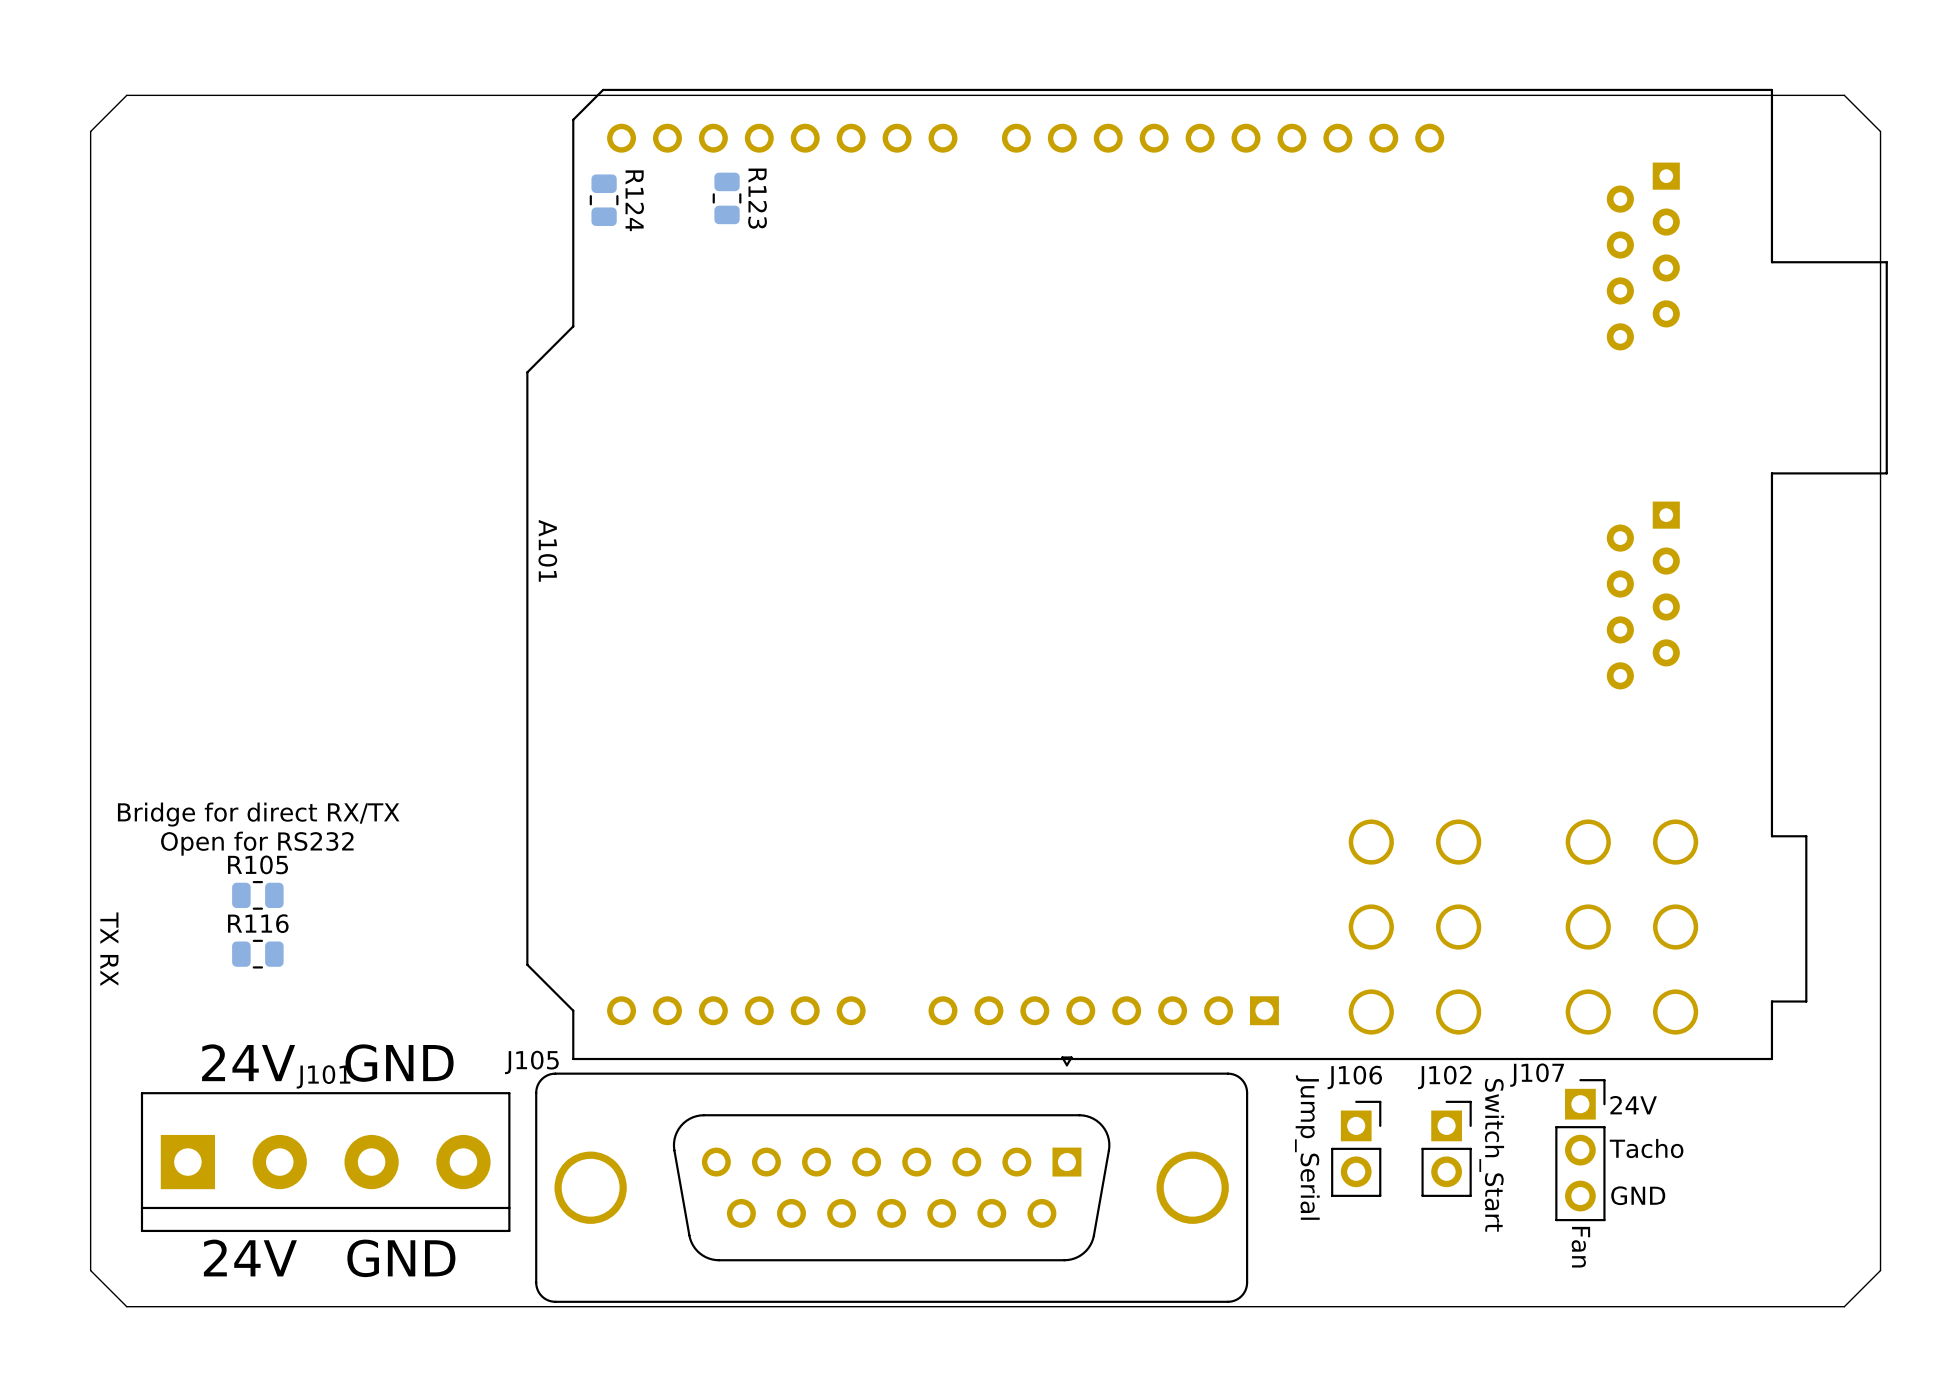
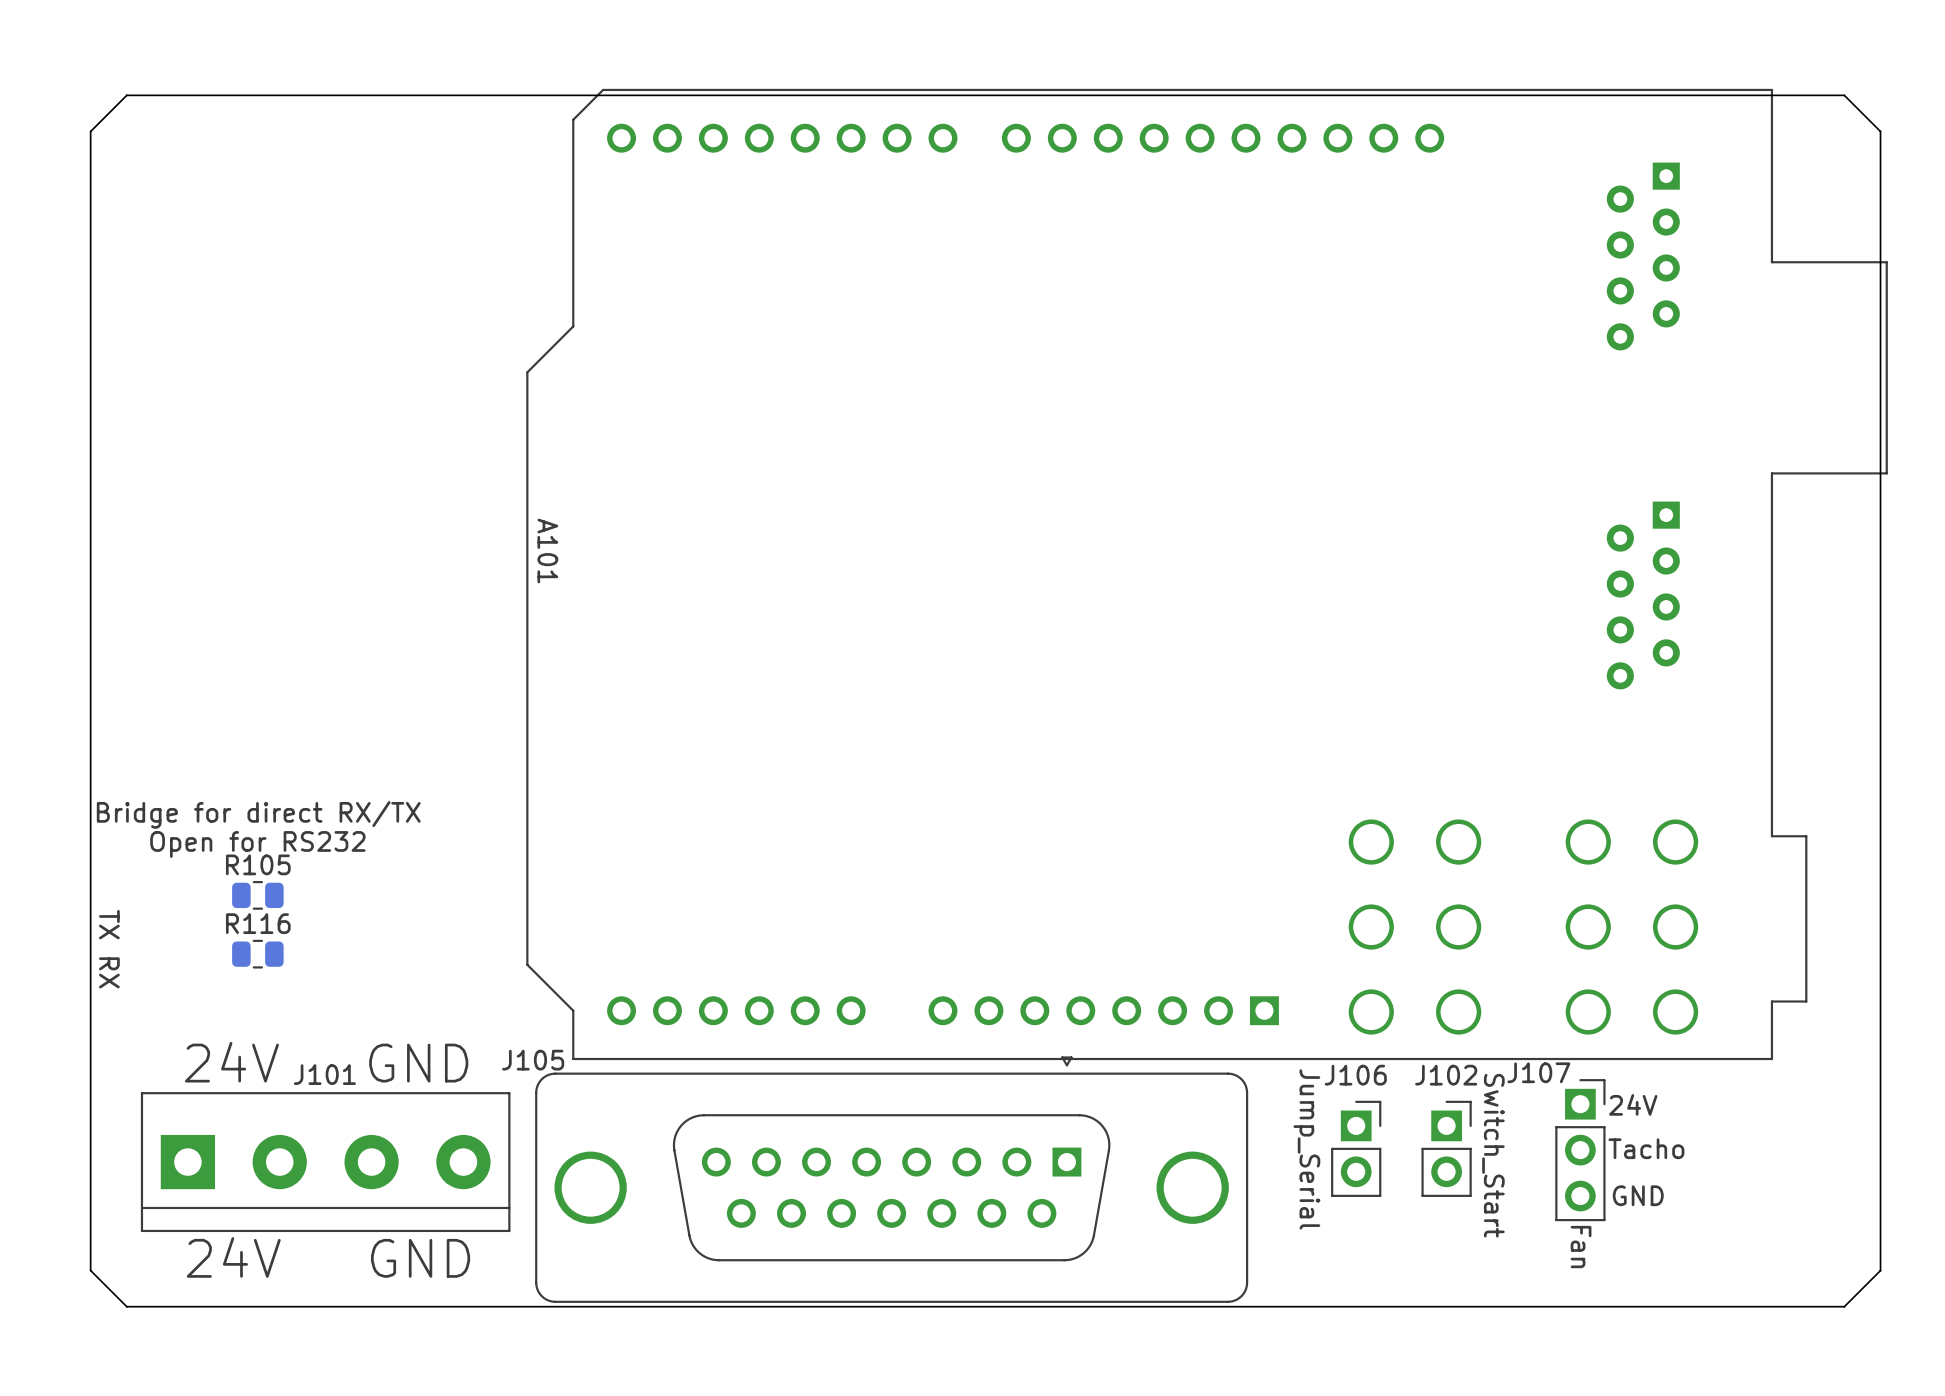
R123: (727, 198) -> none
R124: (604, 200) -> none

